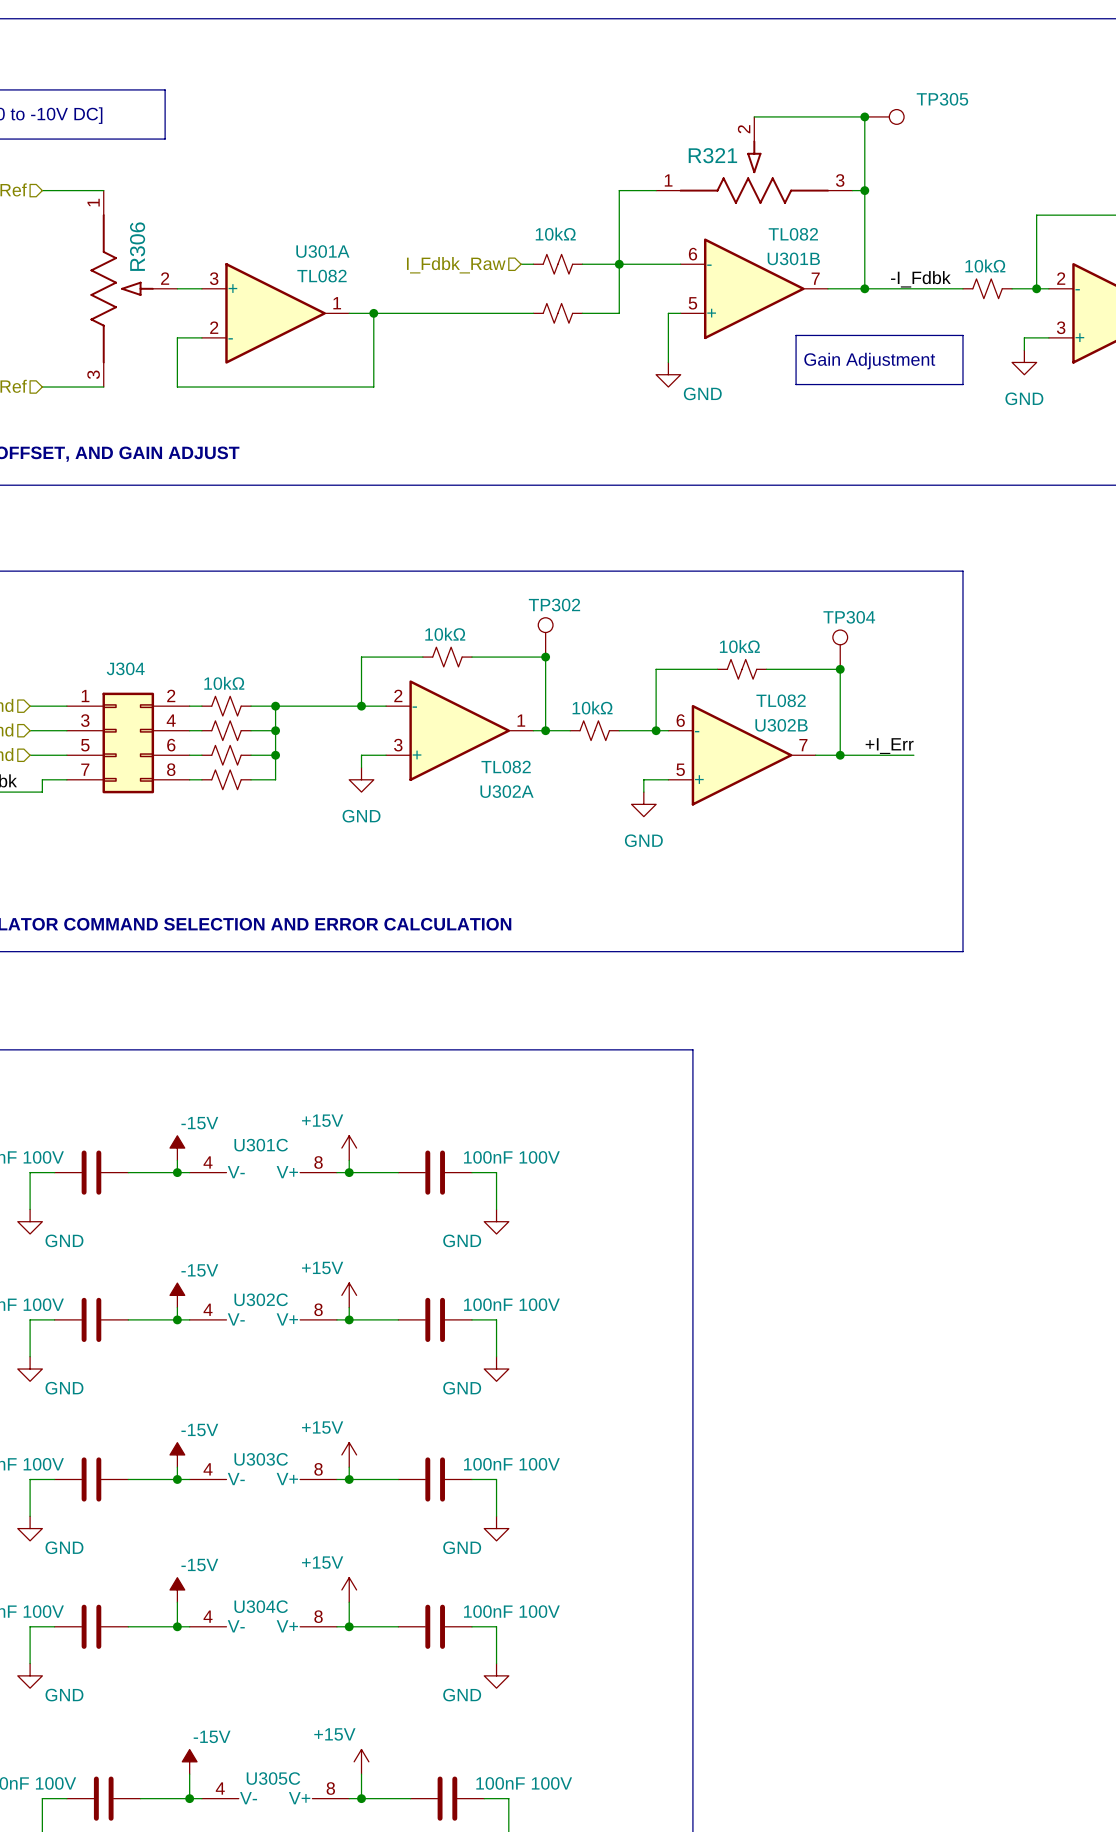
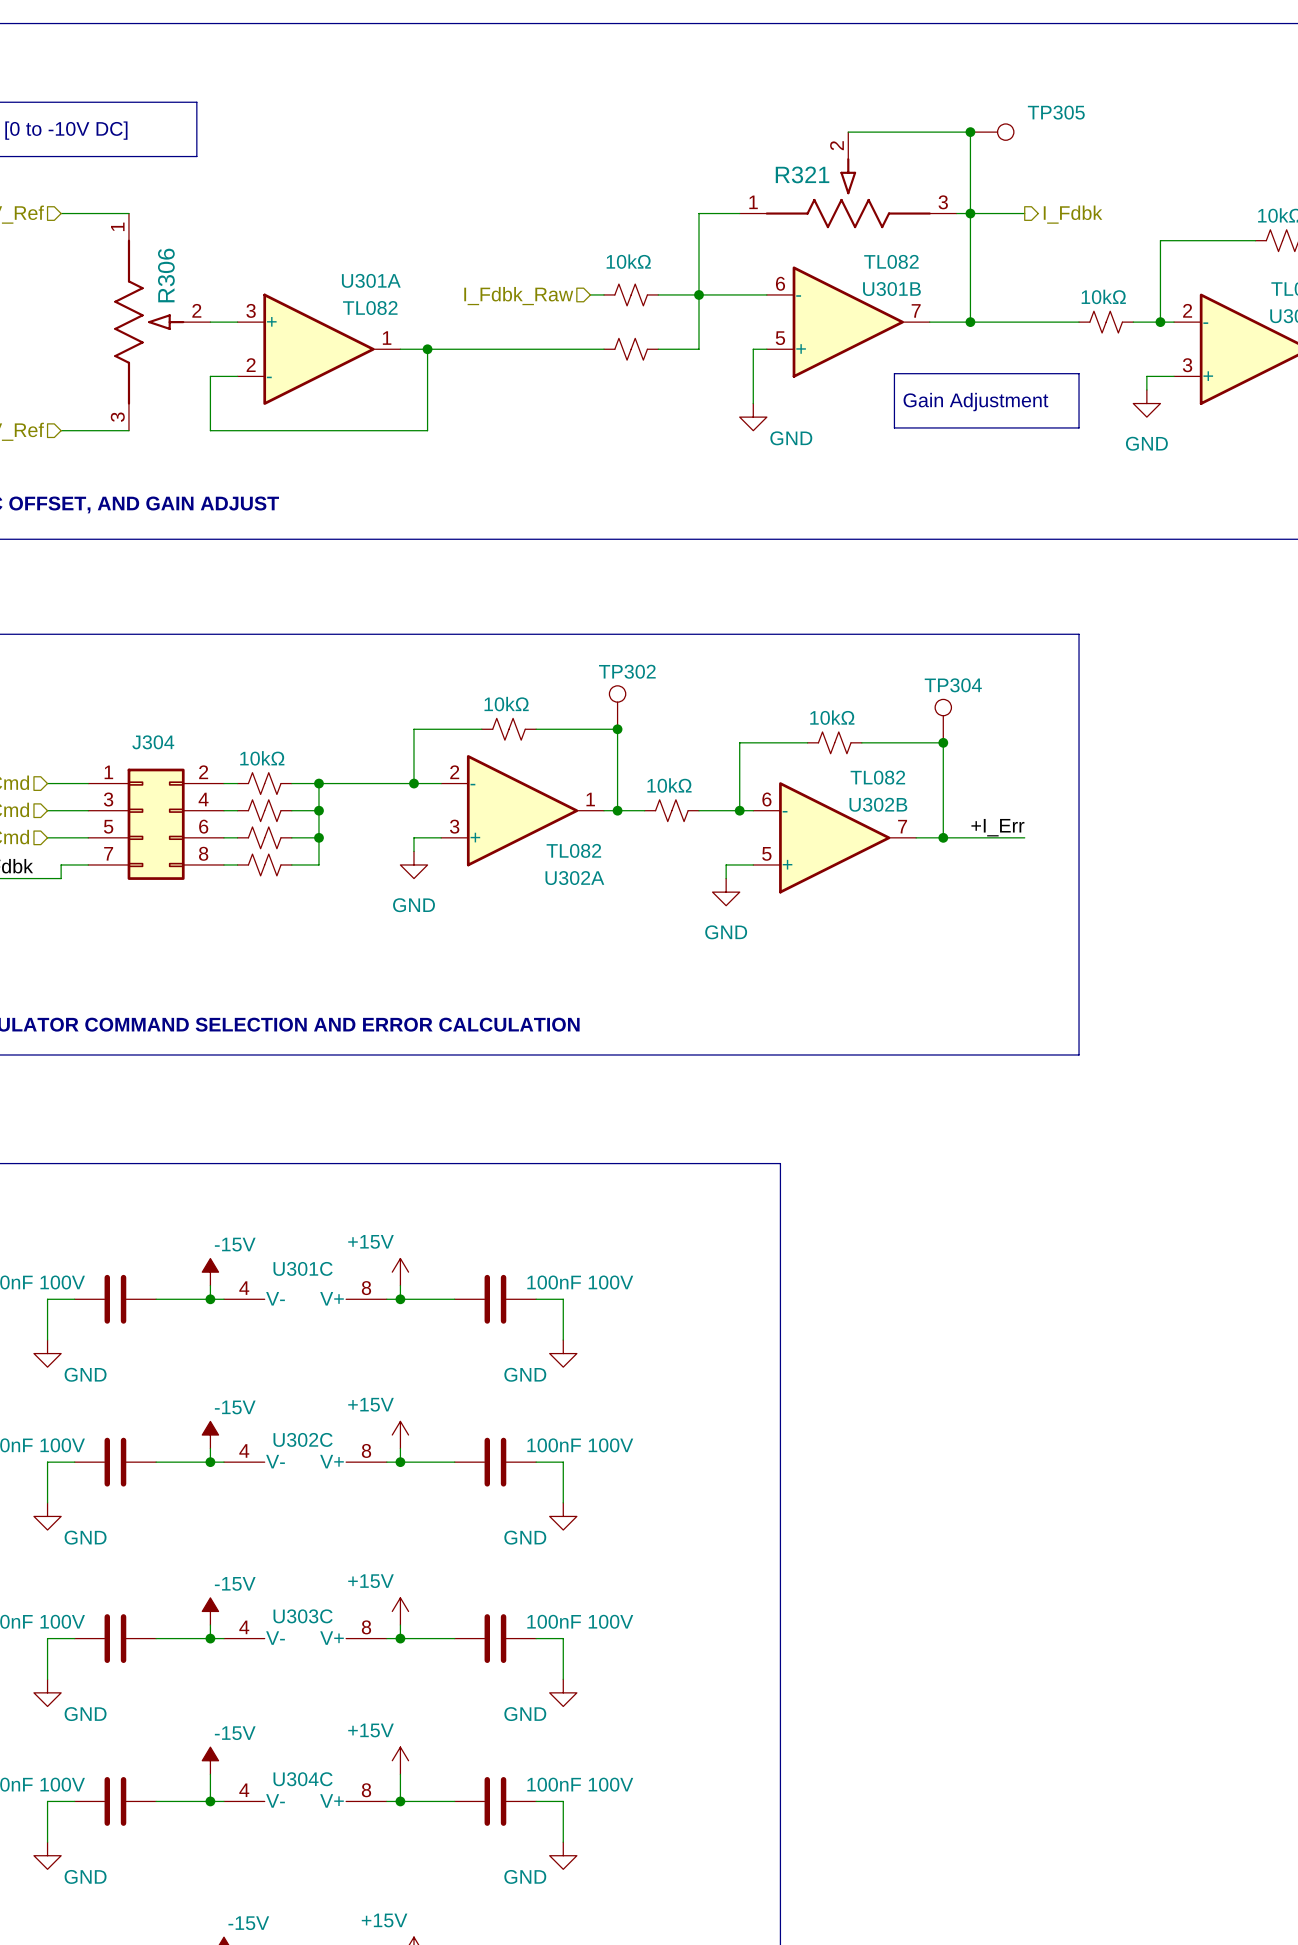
wire: none -> (970, 213) (1024, 213)
hierarchical label: none -> I_Fdbk (1073, 214)
label: -I_Fdbk (920, 279) -> none

